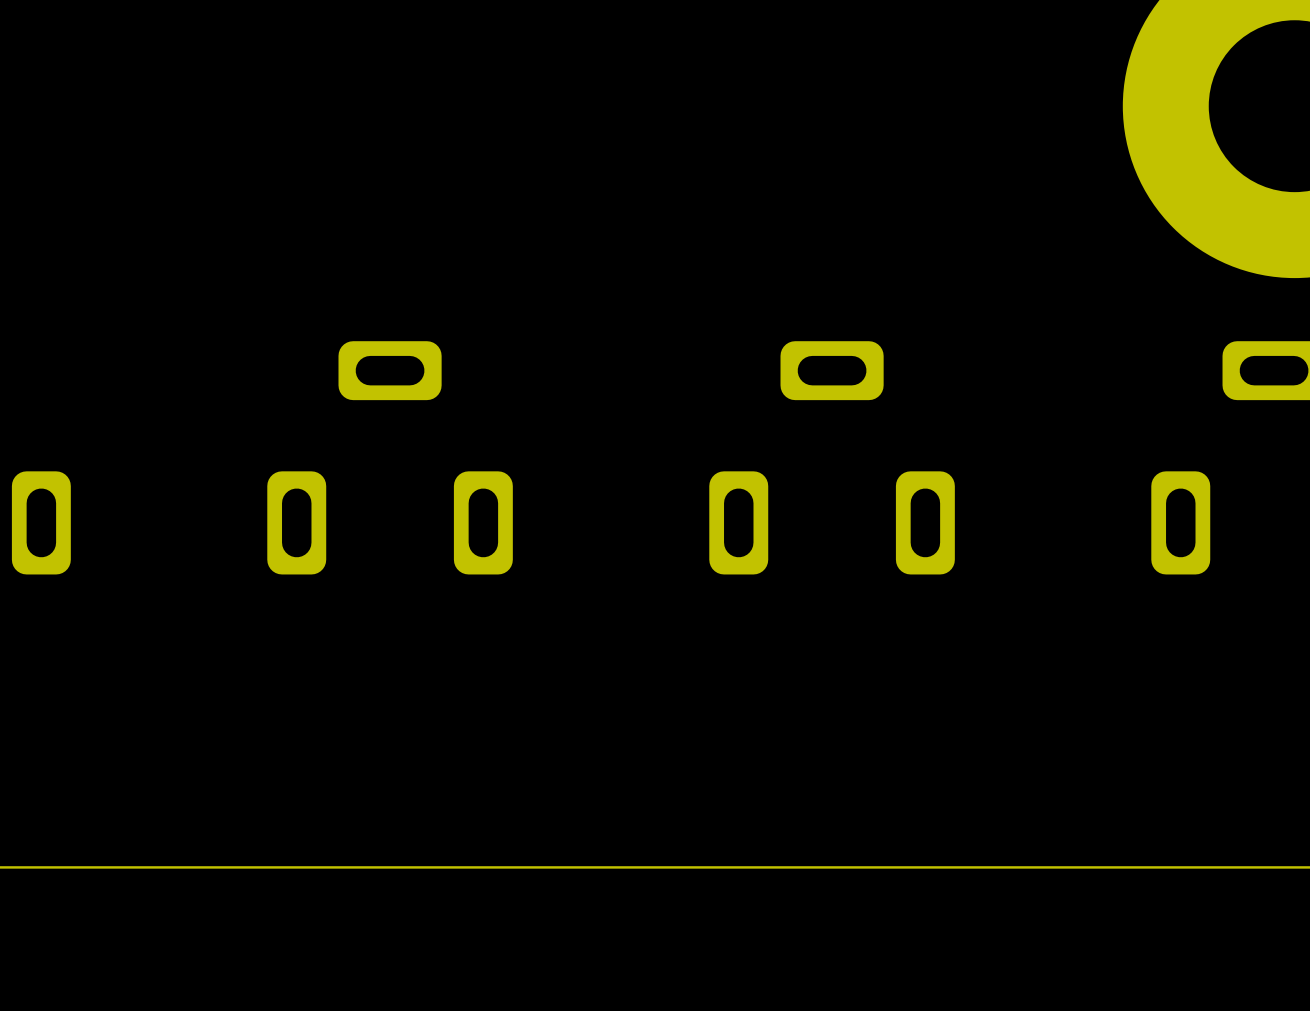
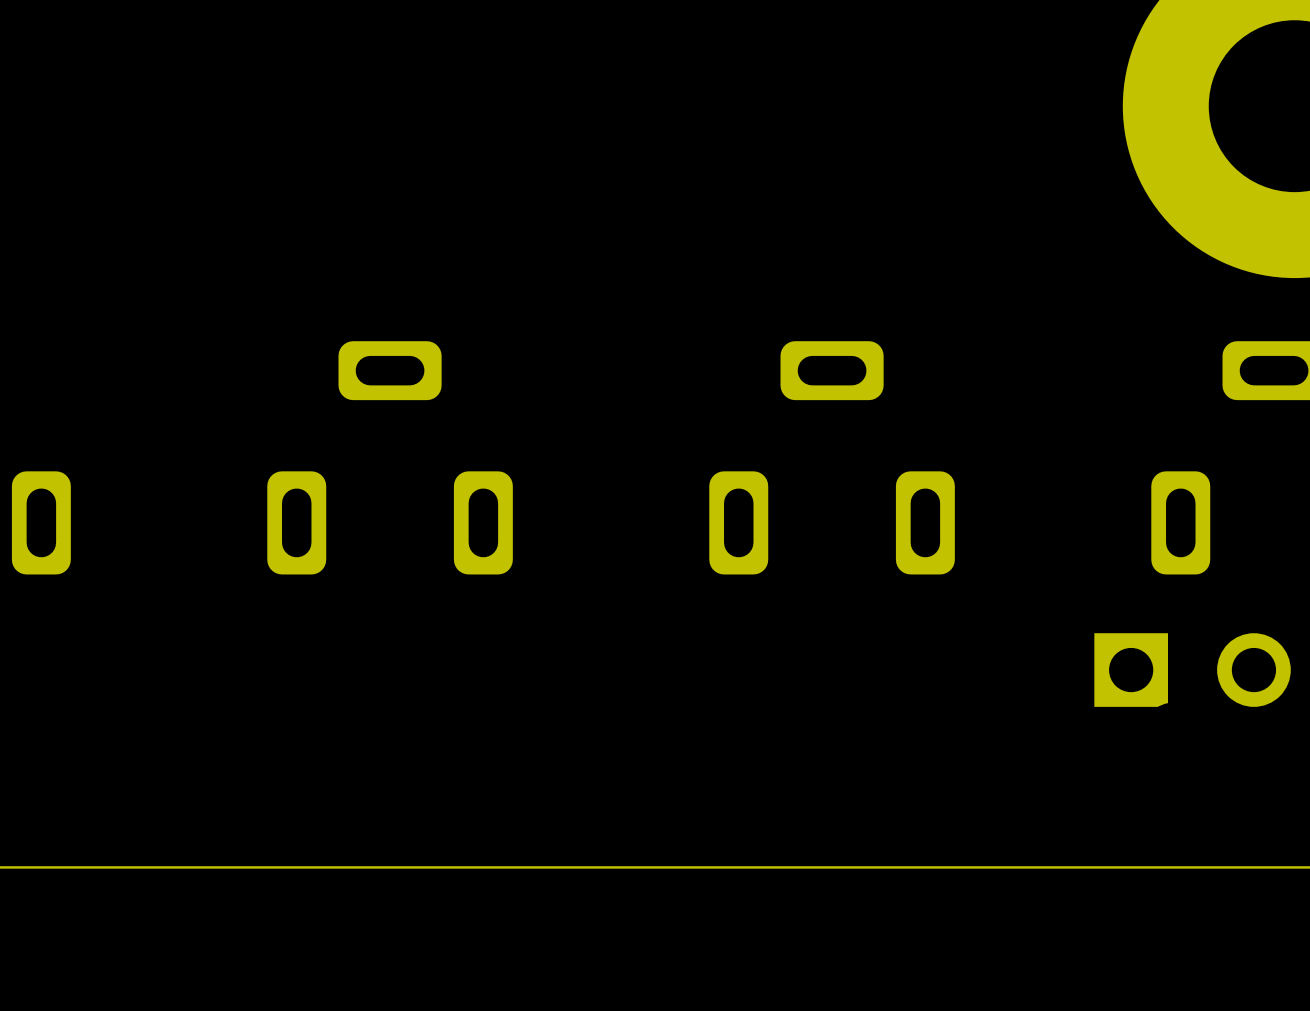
part: none -> (1192, 670)

